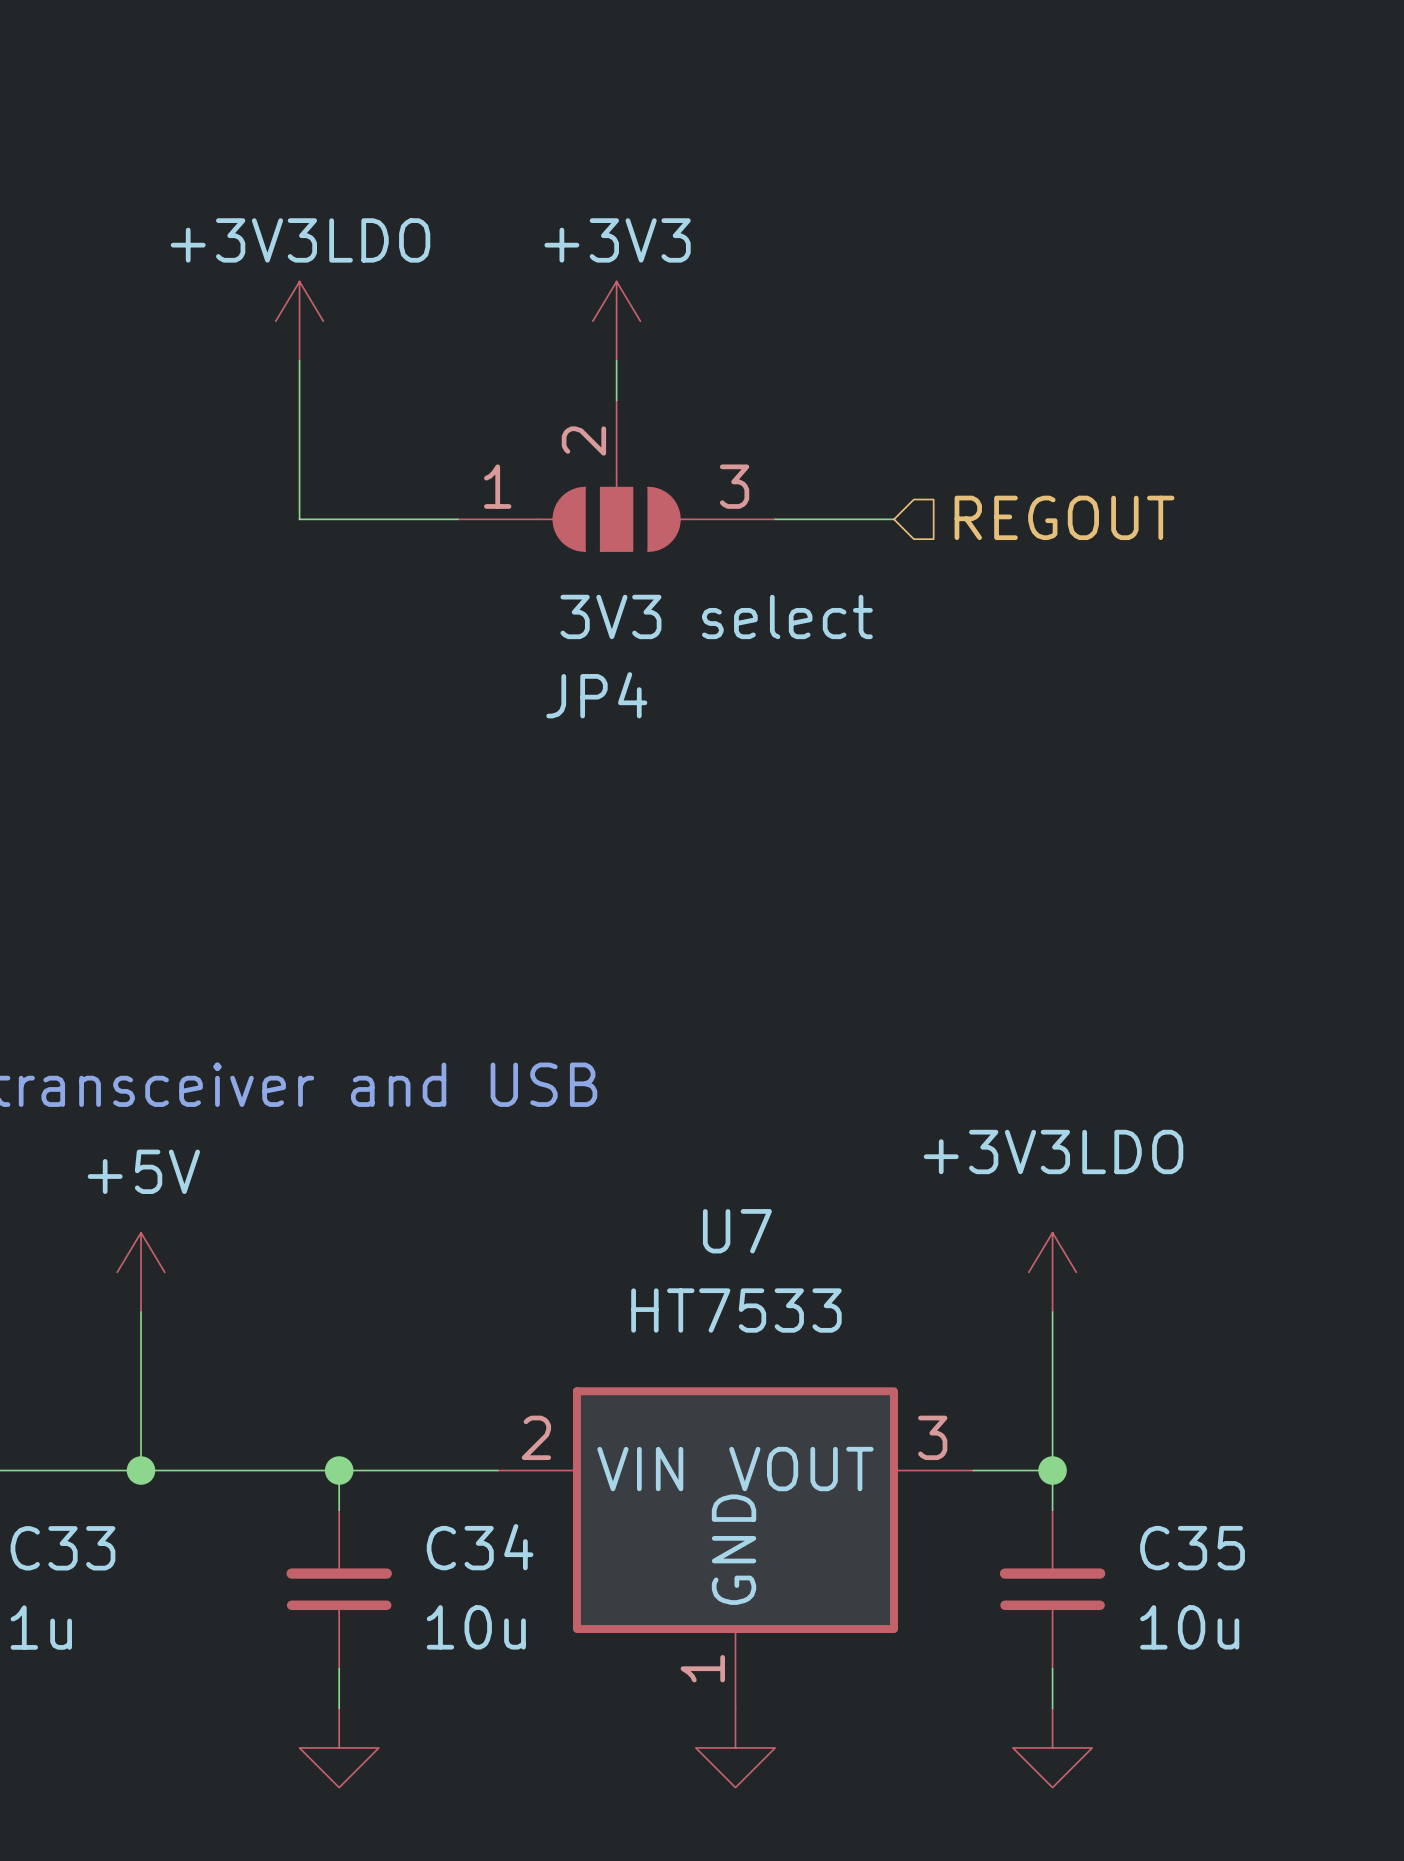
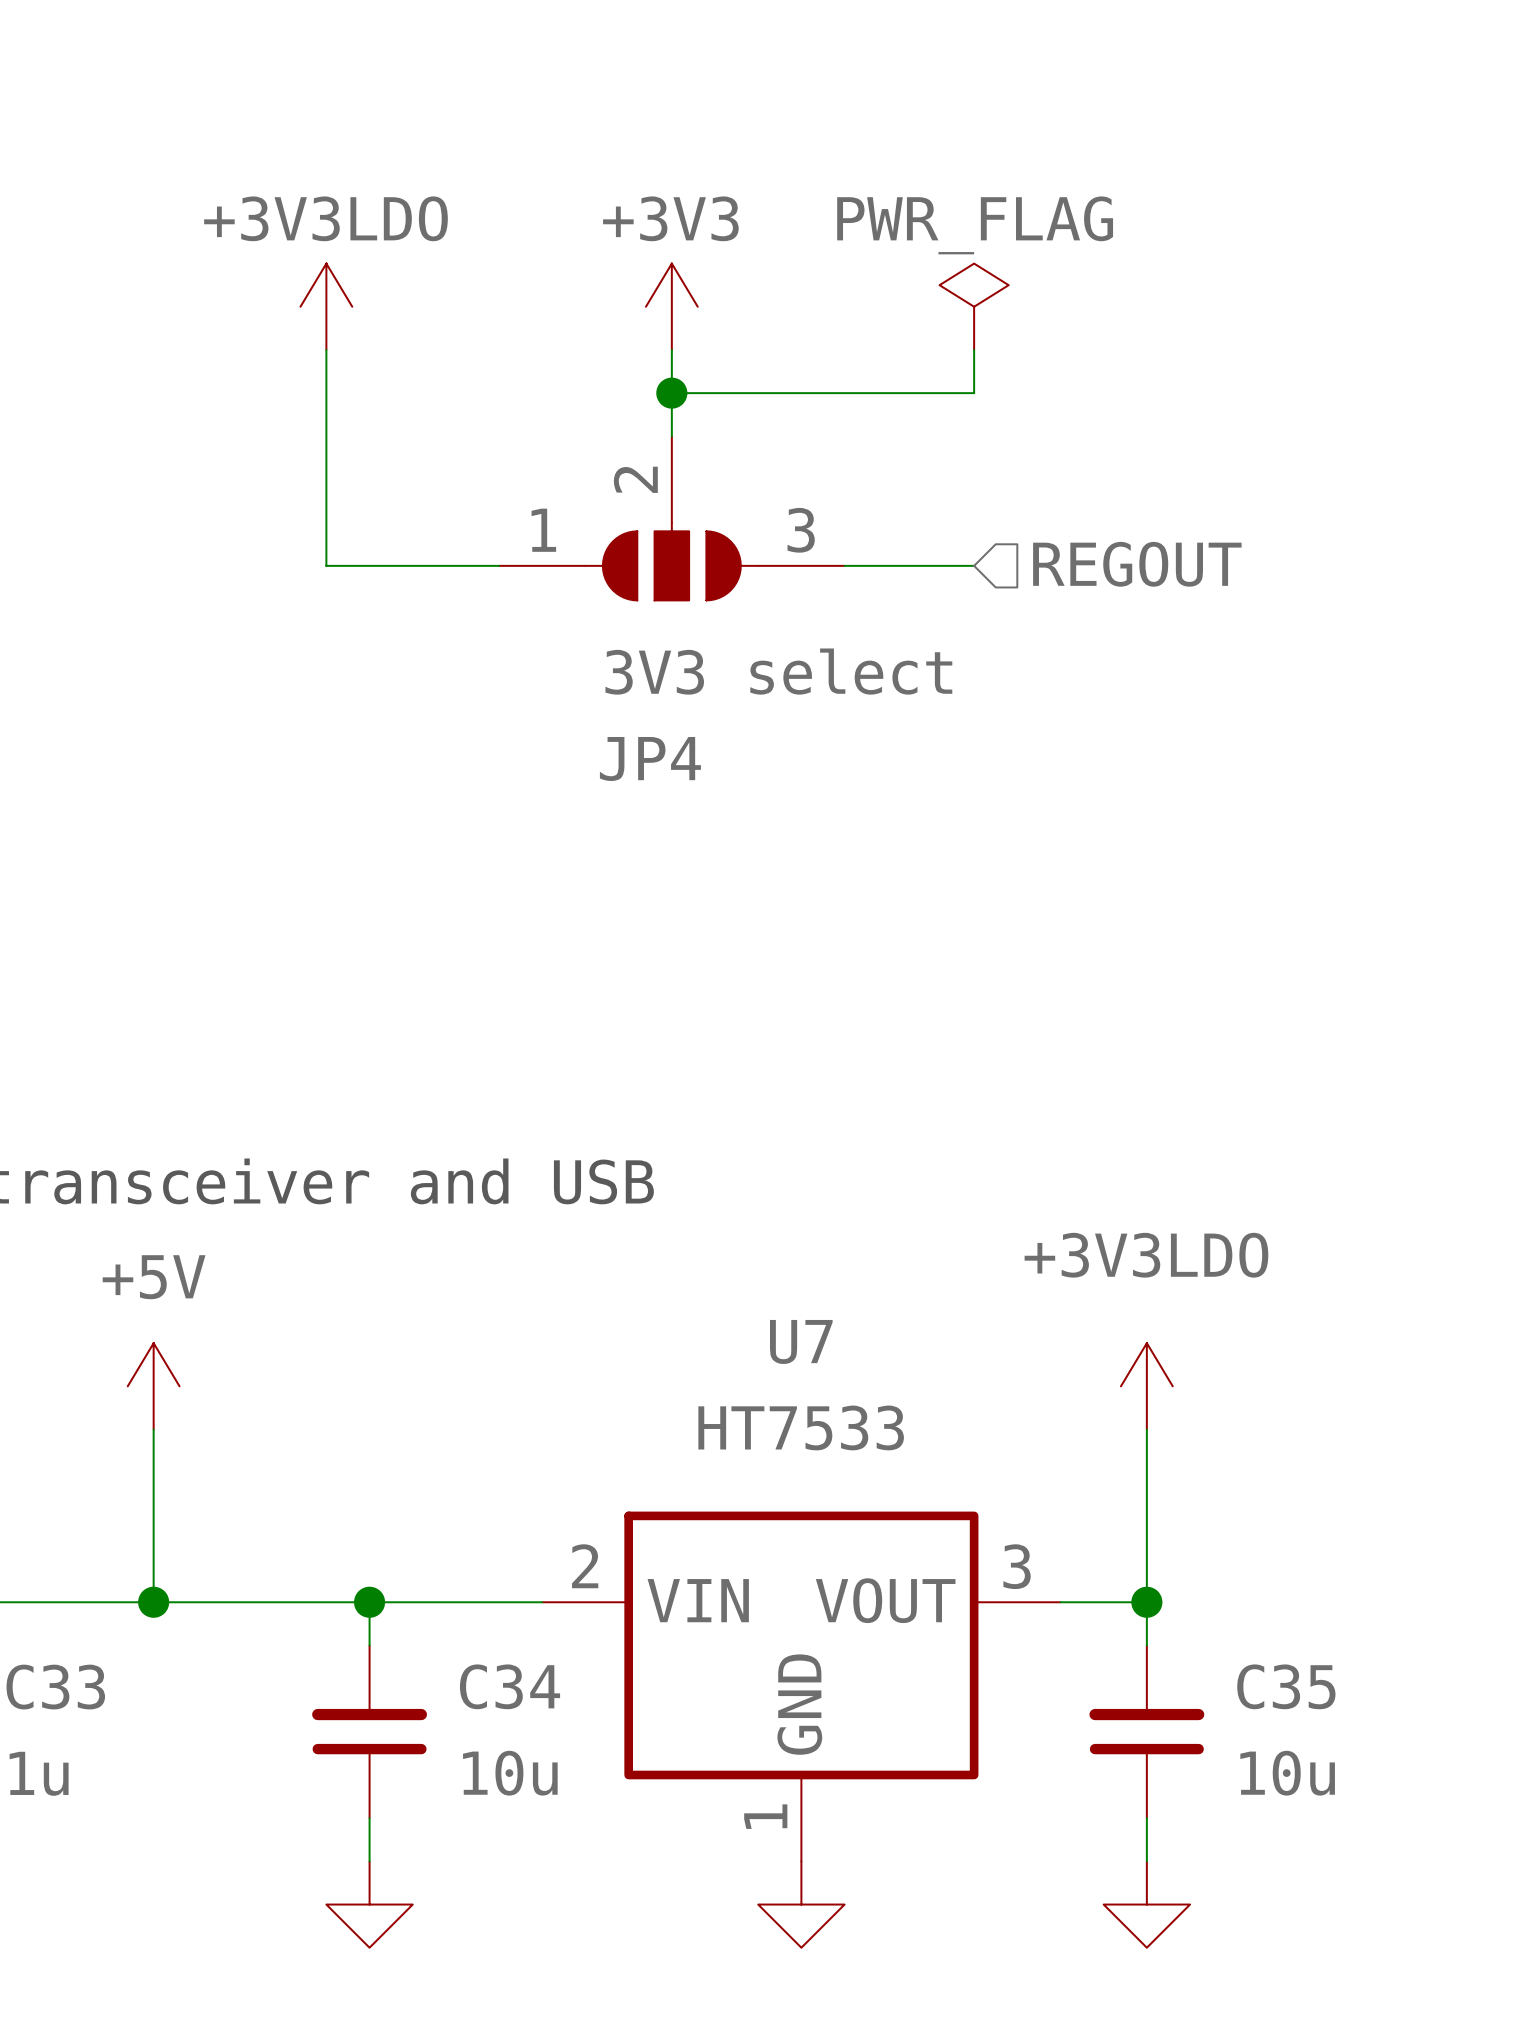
power symbol: none -> PWR_FLAG (974, 306)
power symbol position: +3V3LDO (299, 321) -> +3V3LDO (326, 306)
wire: none -> (671, 349) (671, 393) (974, 393) (974, 349)
power symbol position: +3V3 (616, 321) -> +3V3 (671, 306)
junction: none -> (671, 393)

